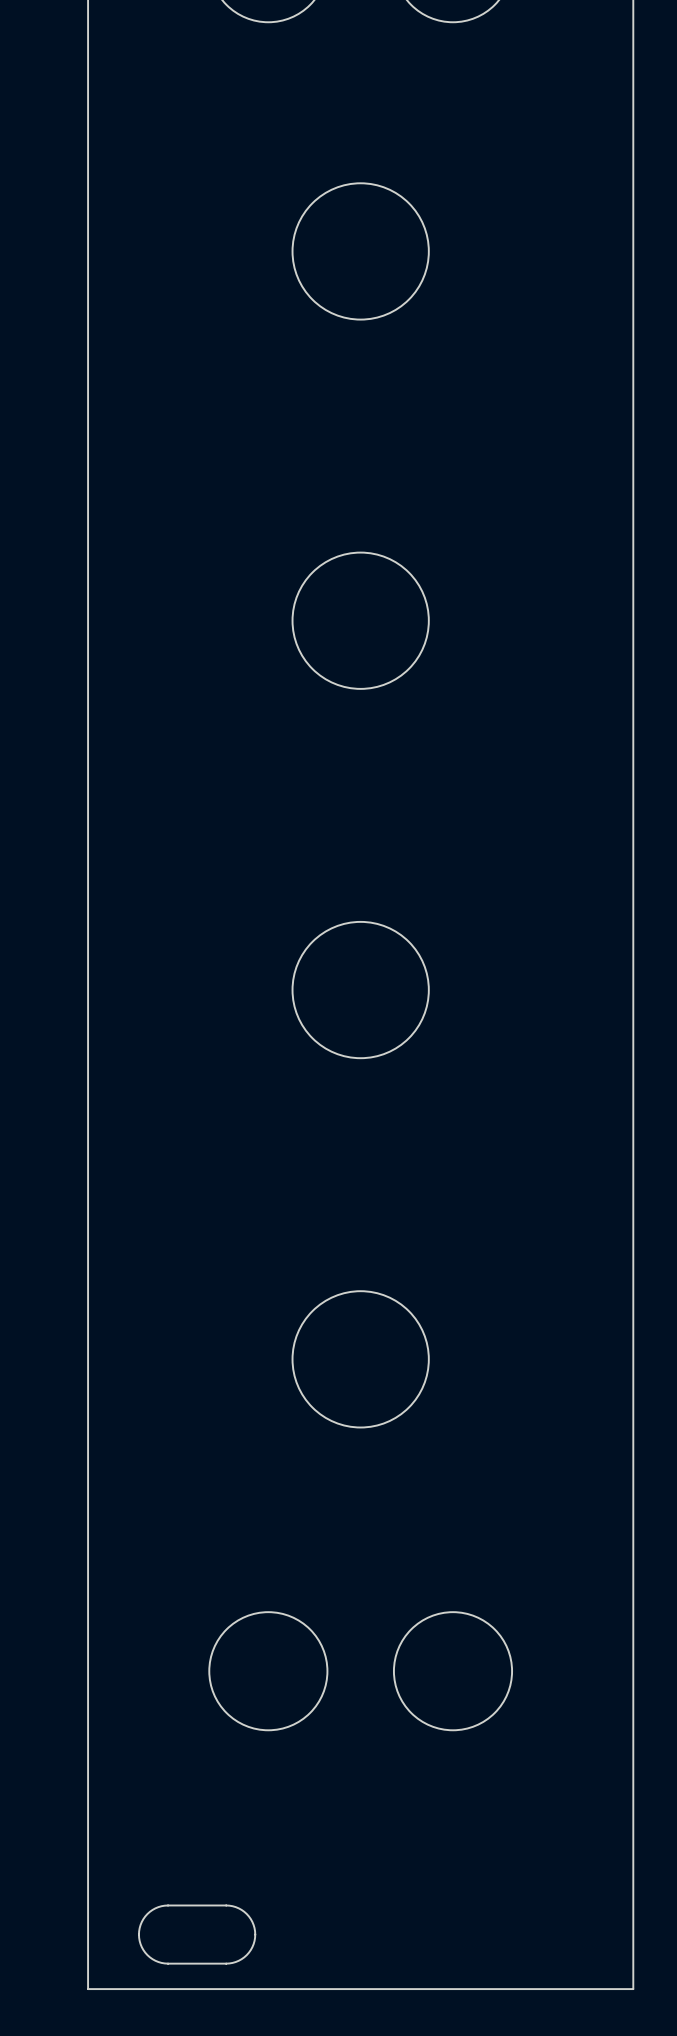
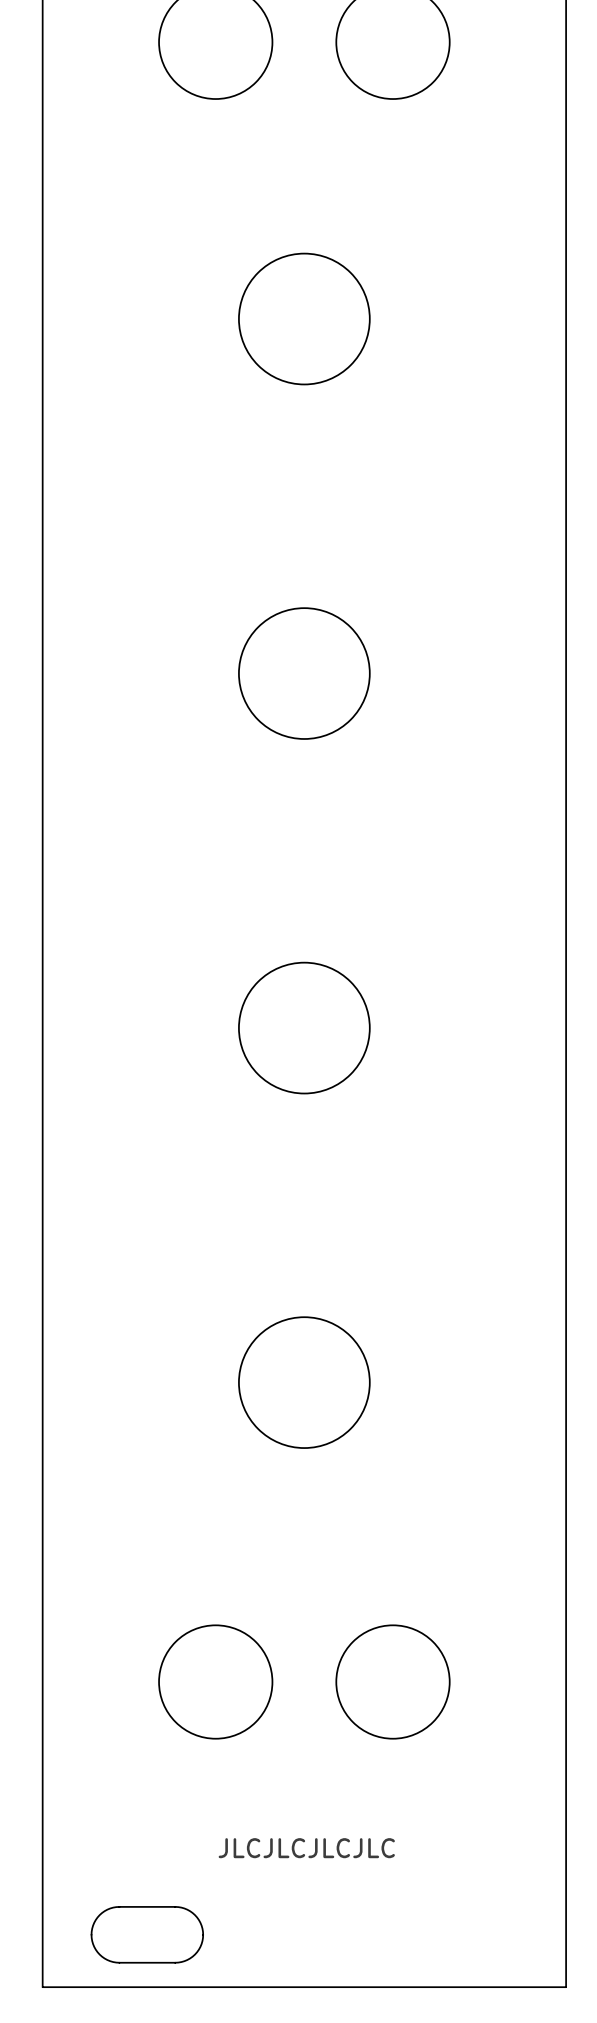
text: none -> JLCJLCJLCJLC (306, 1848)

